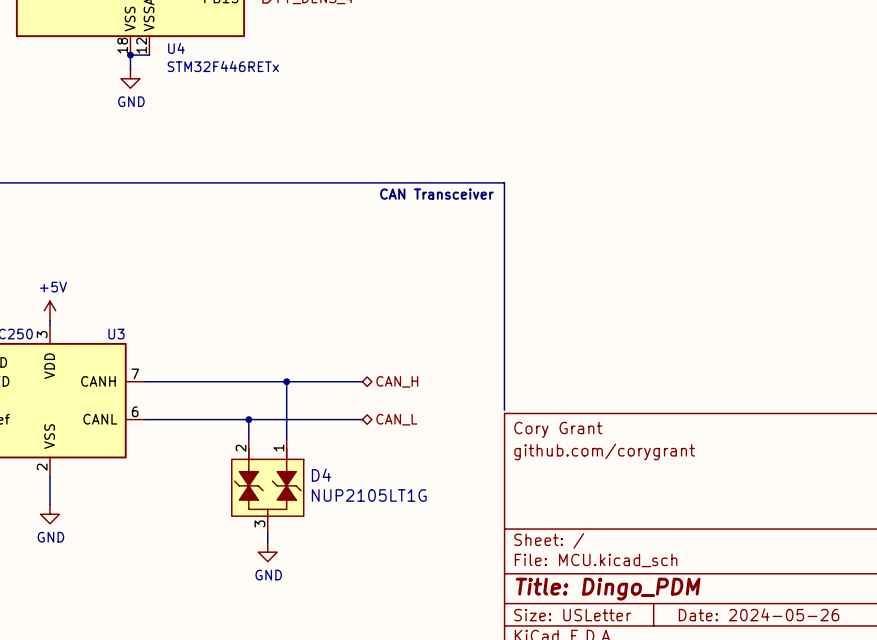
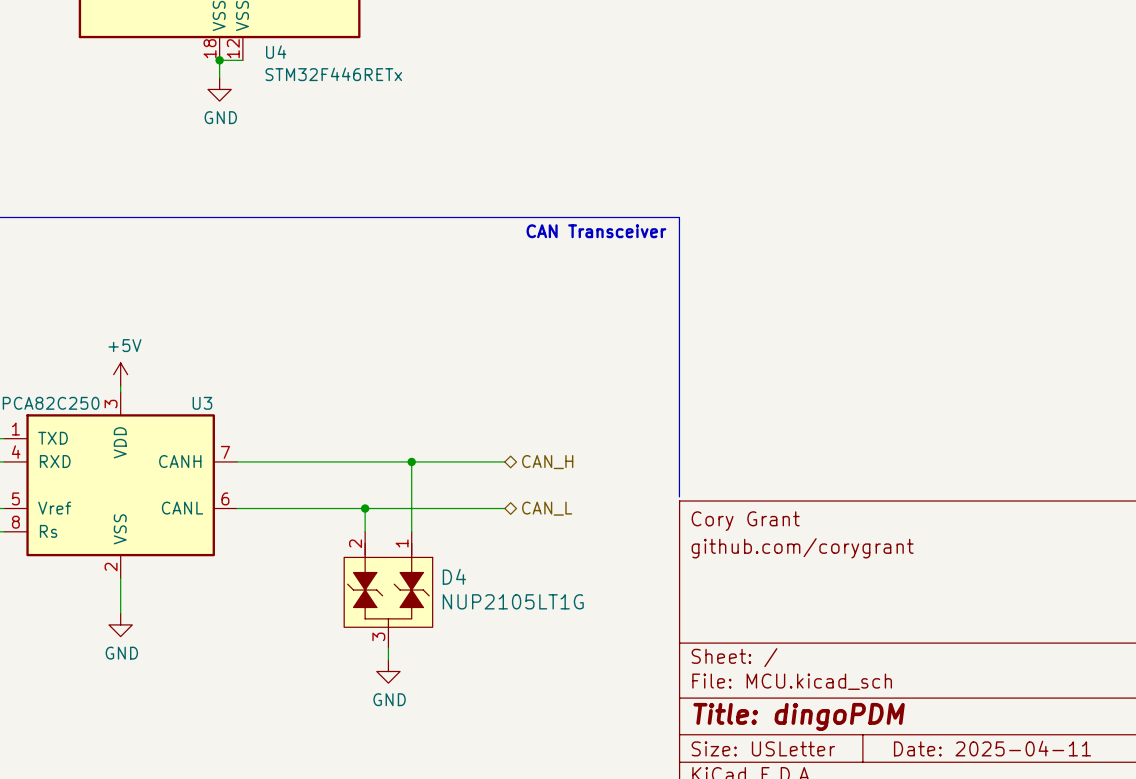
title block: Title: Dingo_PDM (608, 589) -> Title: dingoPDM (799, 716)
title block: Date: 2024-05-26 (759, 614) -> Date: 2025-04-11 (992, 748)

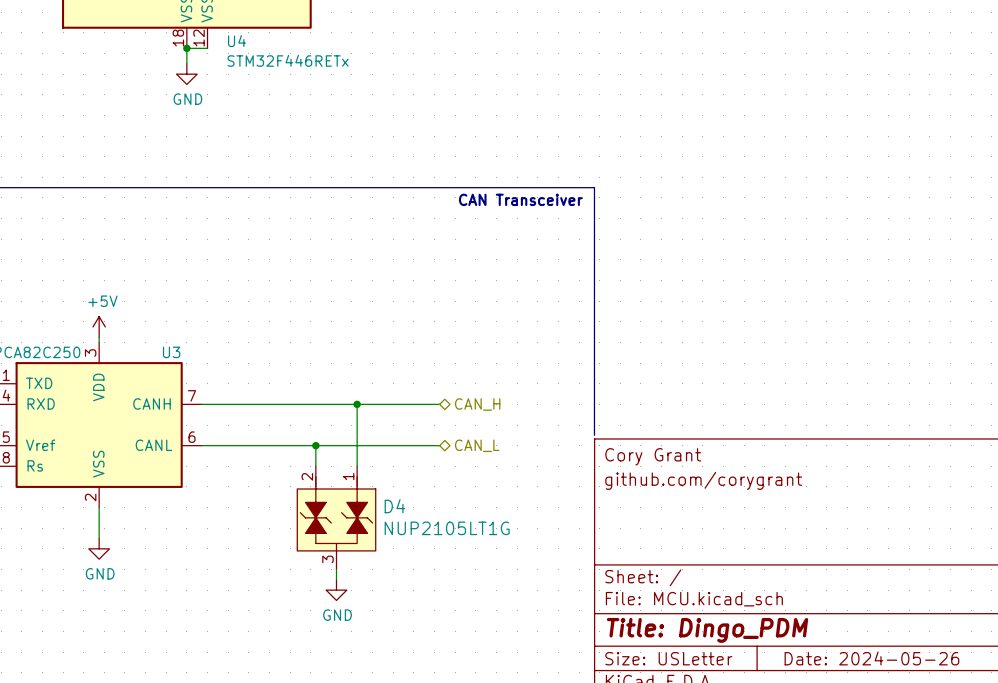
title block: Title: dingoPDM (799, 716) -> Title: Dingo_PDM (707, 630)
title block: Date: 2025-04-11 (992, 748) -> Date: 2024-05-26 (871, 658)

